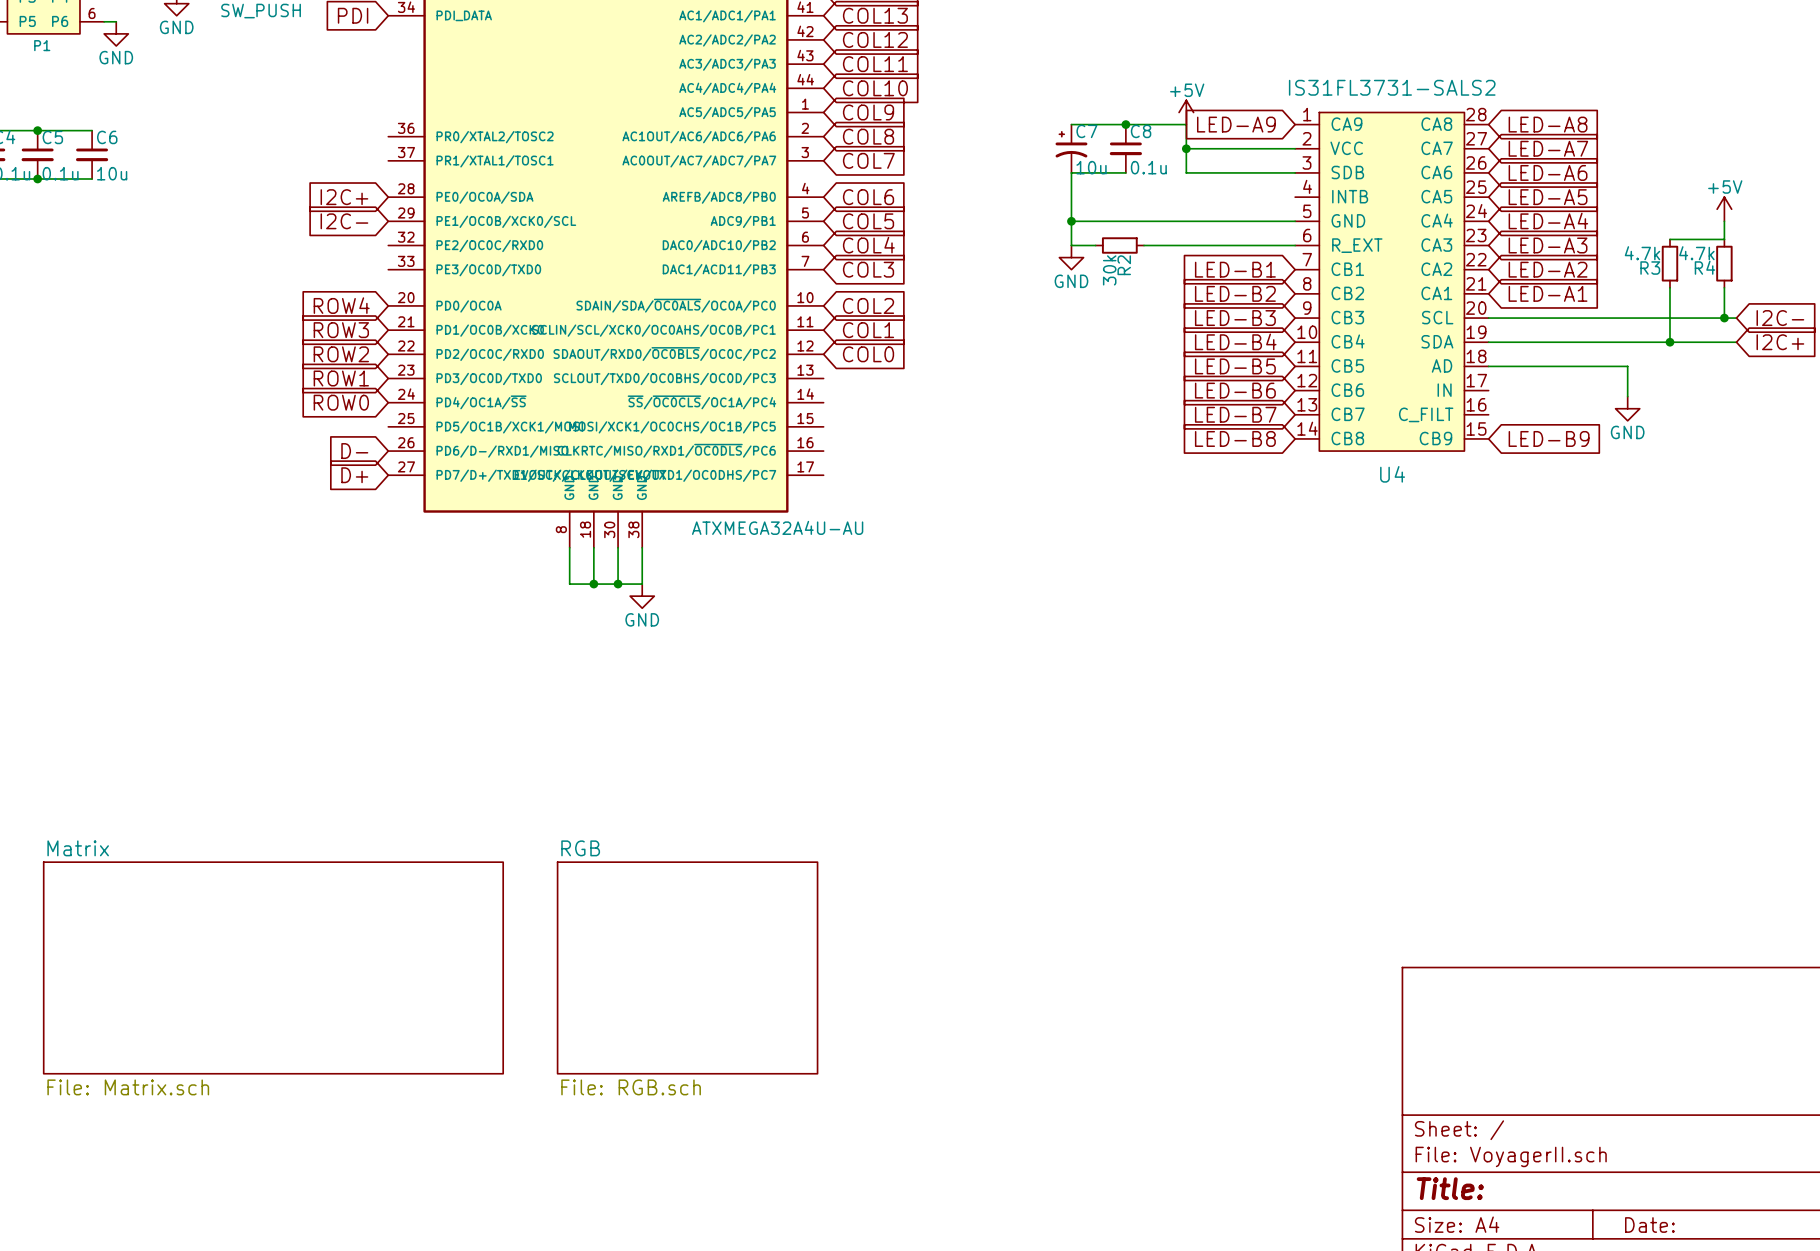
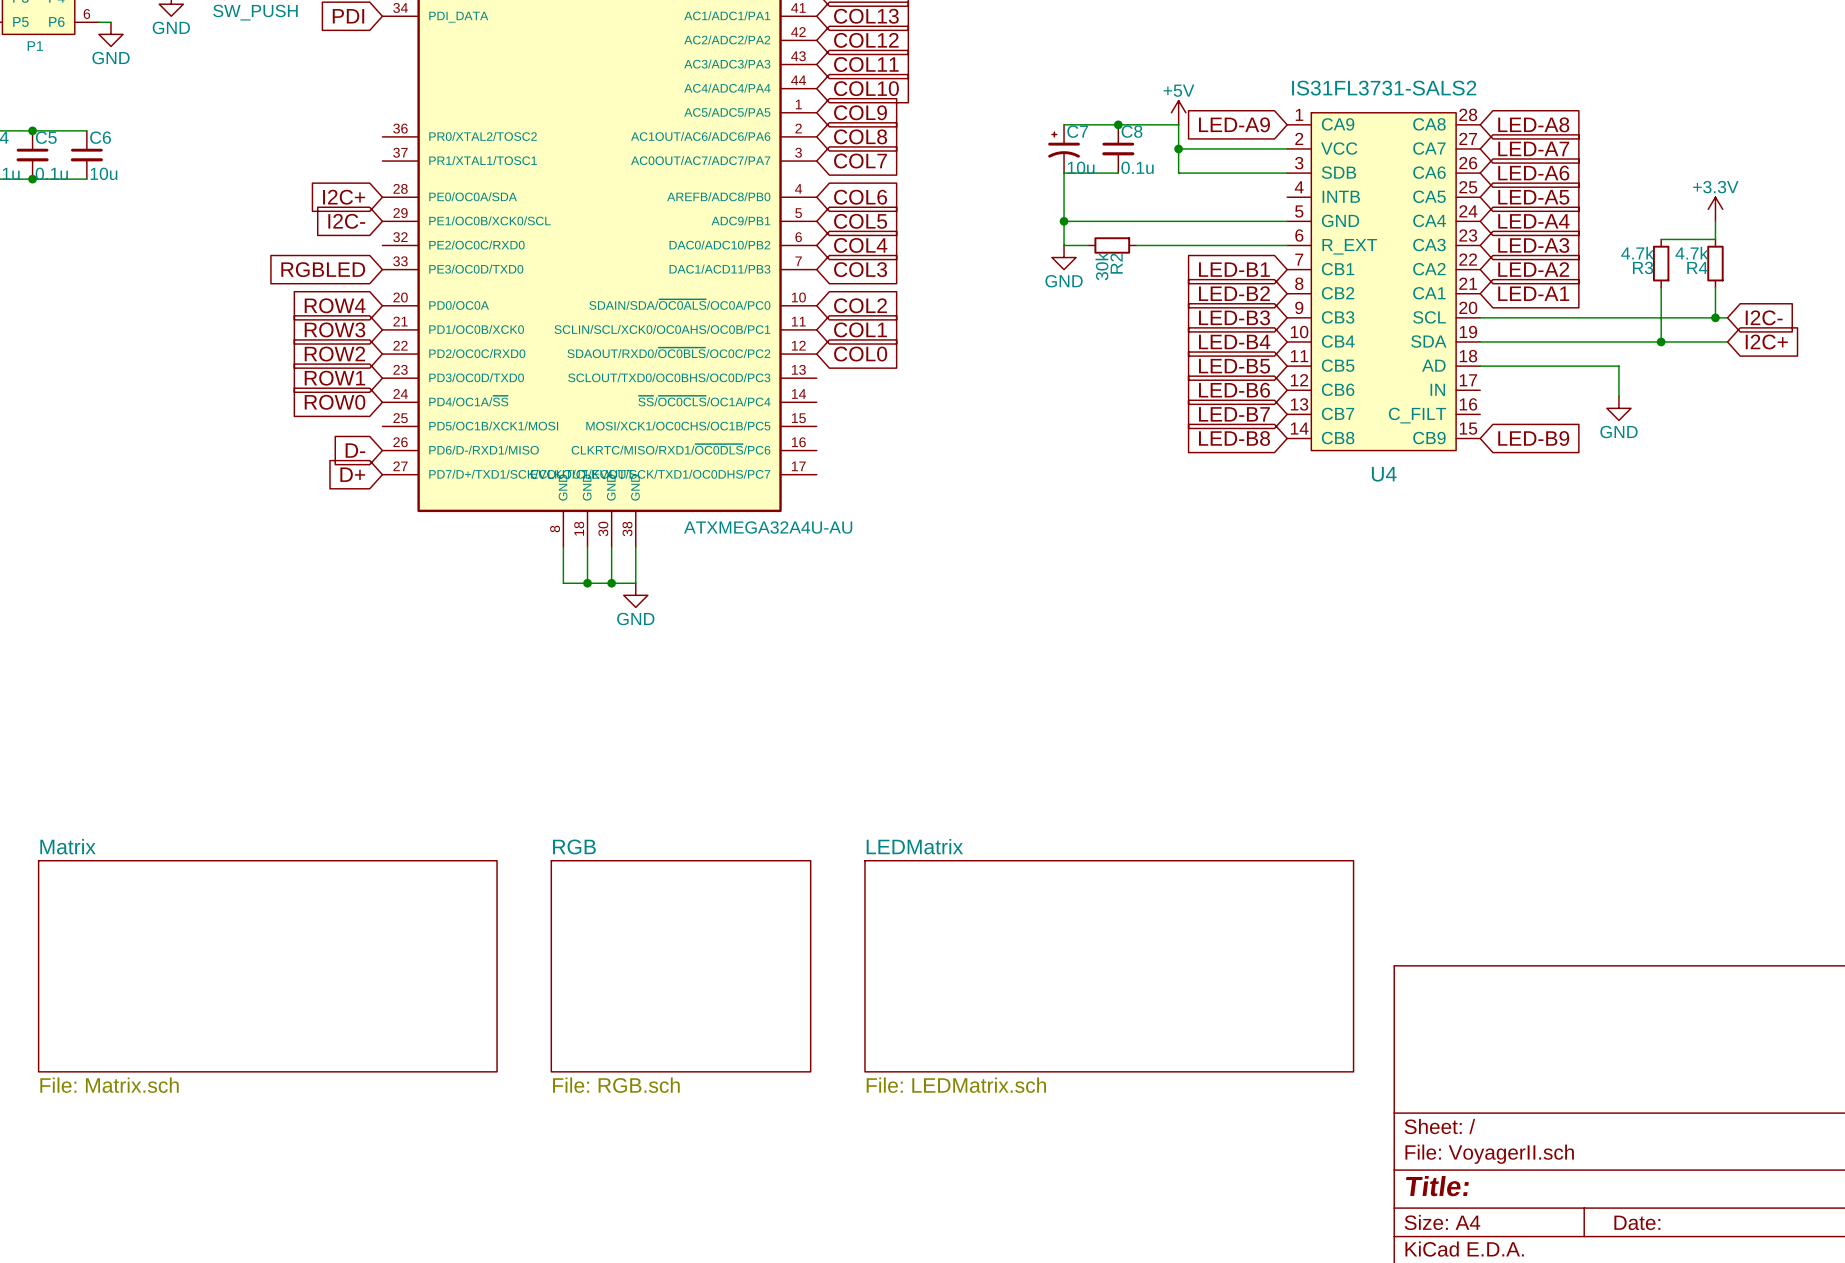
power symbol: +5V (1724, 209) -> +3.3V (1715, 209)
global label: none -> RGBLED (323, 269)
sheet LEDMatrix: none -> File: LEDMatrix.sch (1109, 966)

